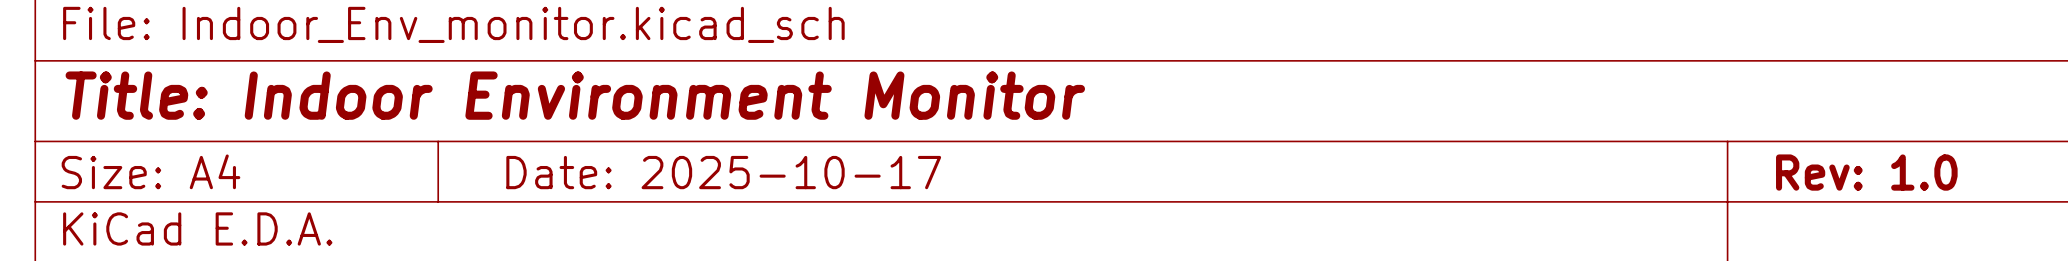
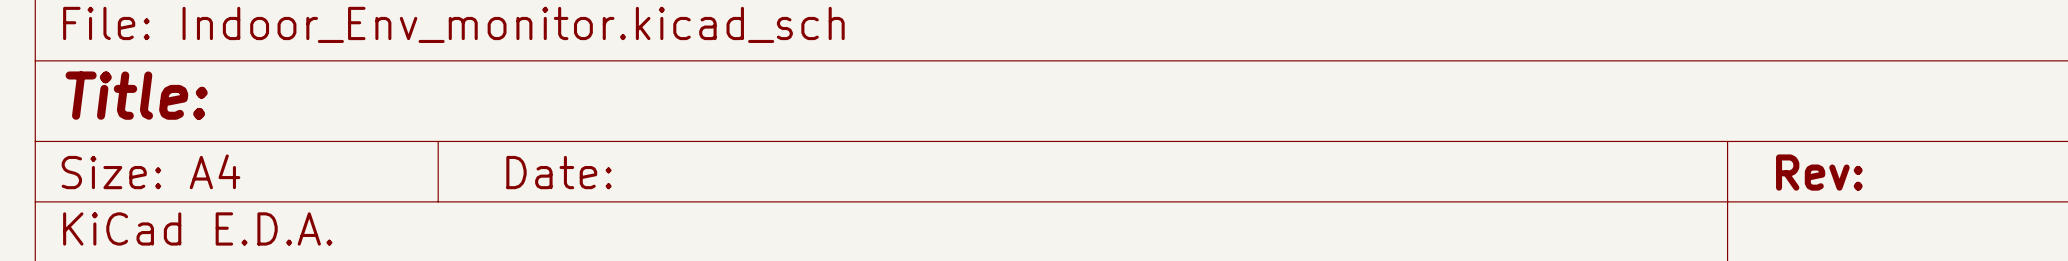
title block: Title: Indoor Environment Monitor (575, 95) -> Title: (136, 95)
title block: Date: 2025-10-17 (723, 172) -> Date: (558, 172)
title block: Rev: 1.0 (1866, 172) -> Rev: (1819, 172)

